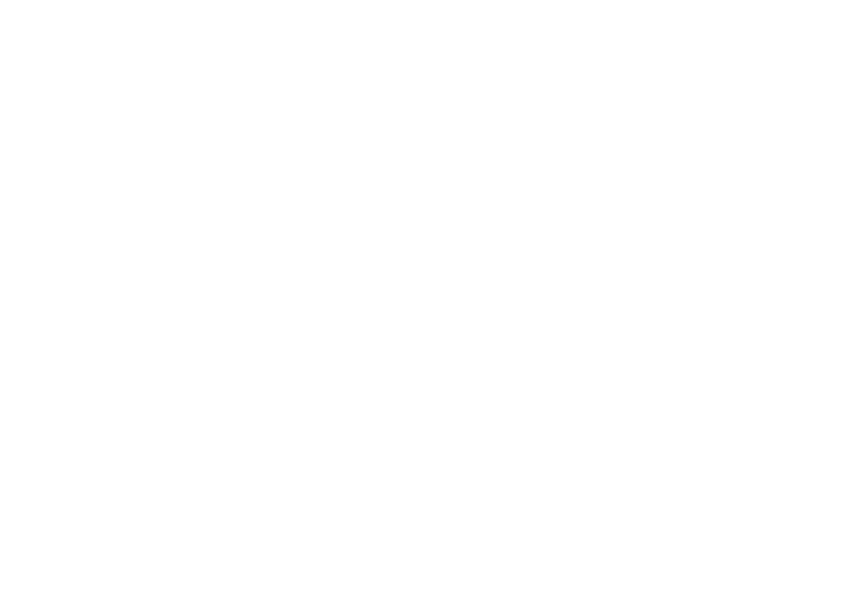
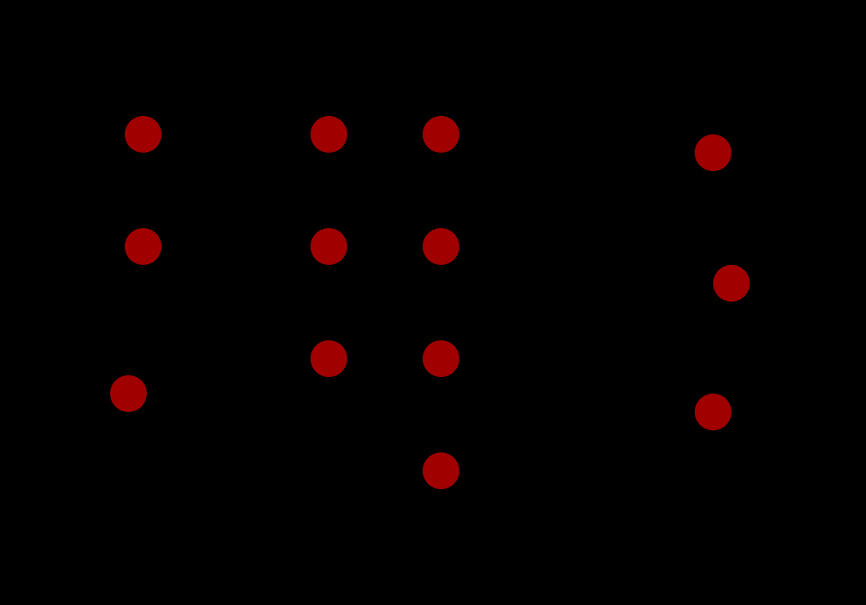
part: none -> (143, 134)
part: none -> (328, 134)
part: none -> (440, 134)
part: none -> (713, 152)
part: none -> (143, 246)
part: none -> (328, 246)
part: none -> (440, 246)
part: none -> (731, 283)
part: none -> (328, 358)
part: none -> (440, 358)
part: none -> (128, 393)
part: none -> (713, 411)
part: none -> (440, 470)

